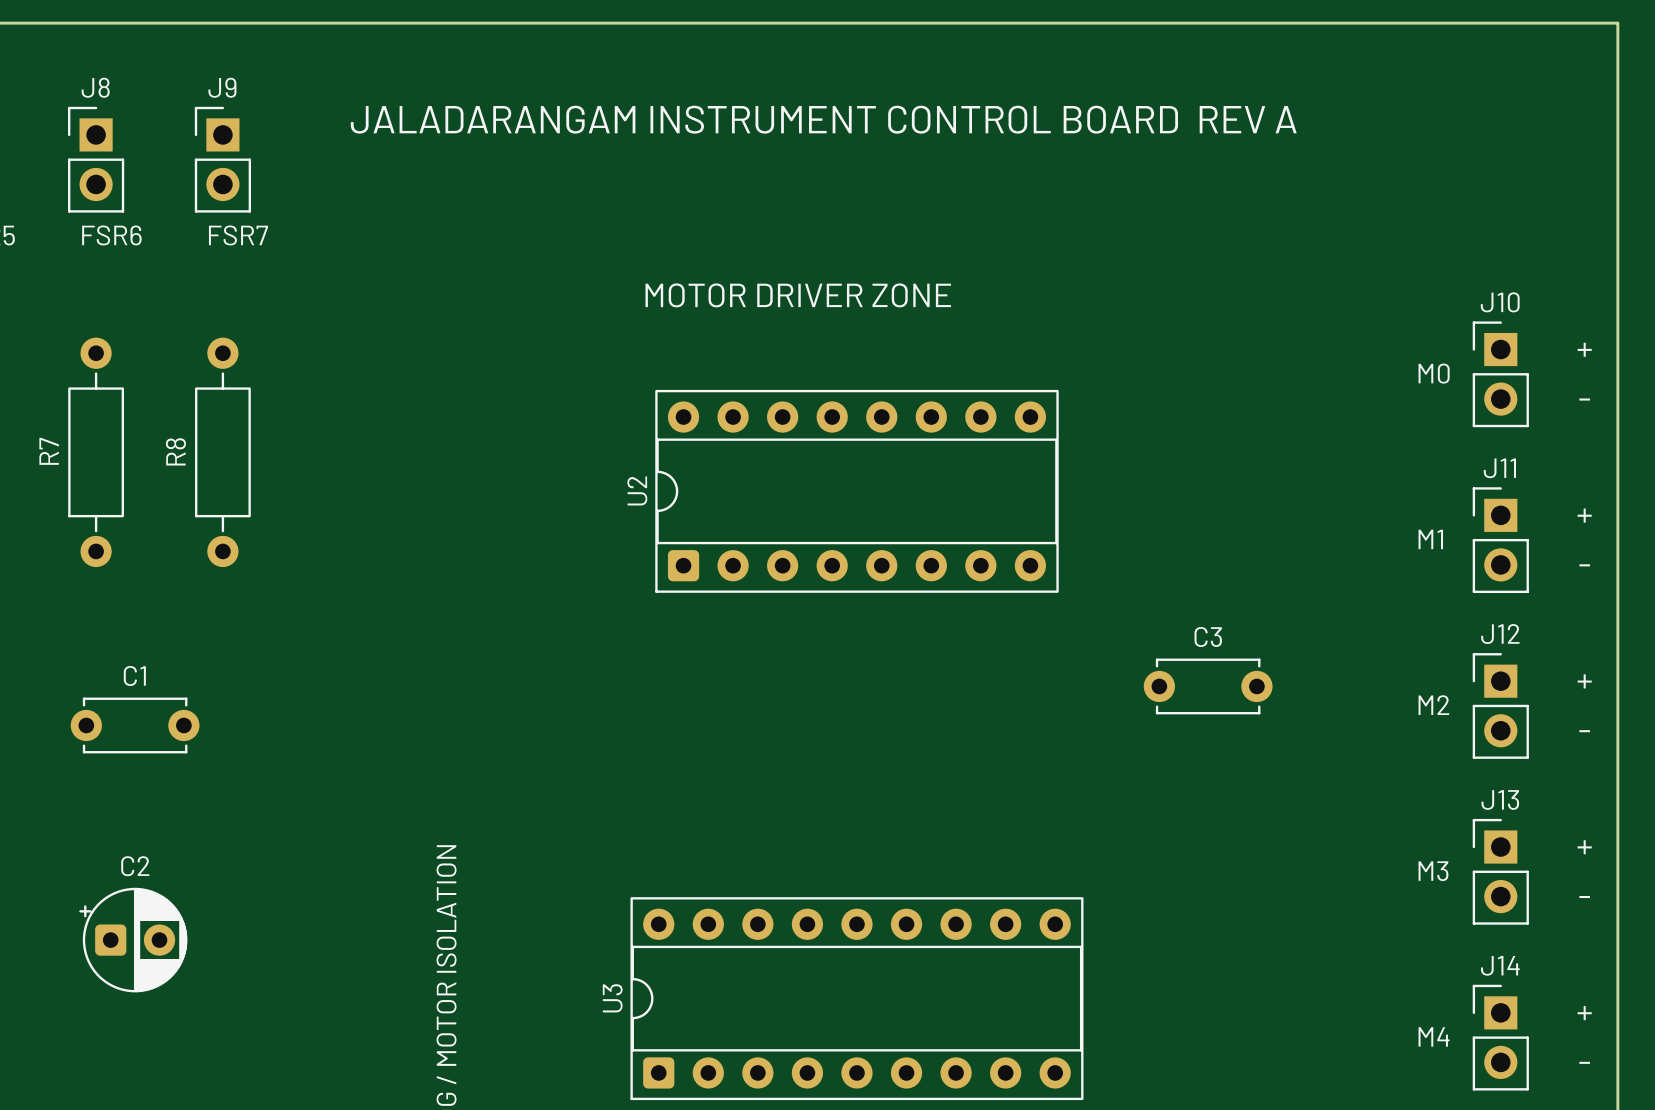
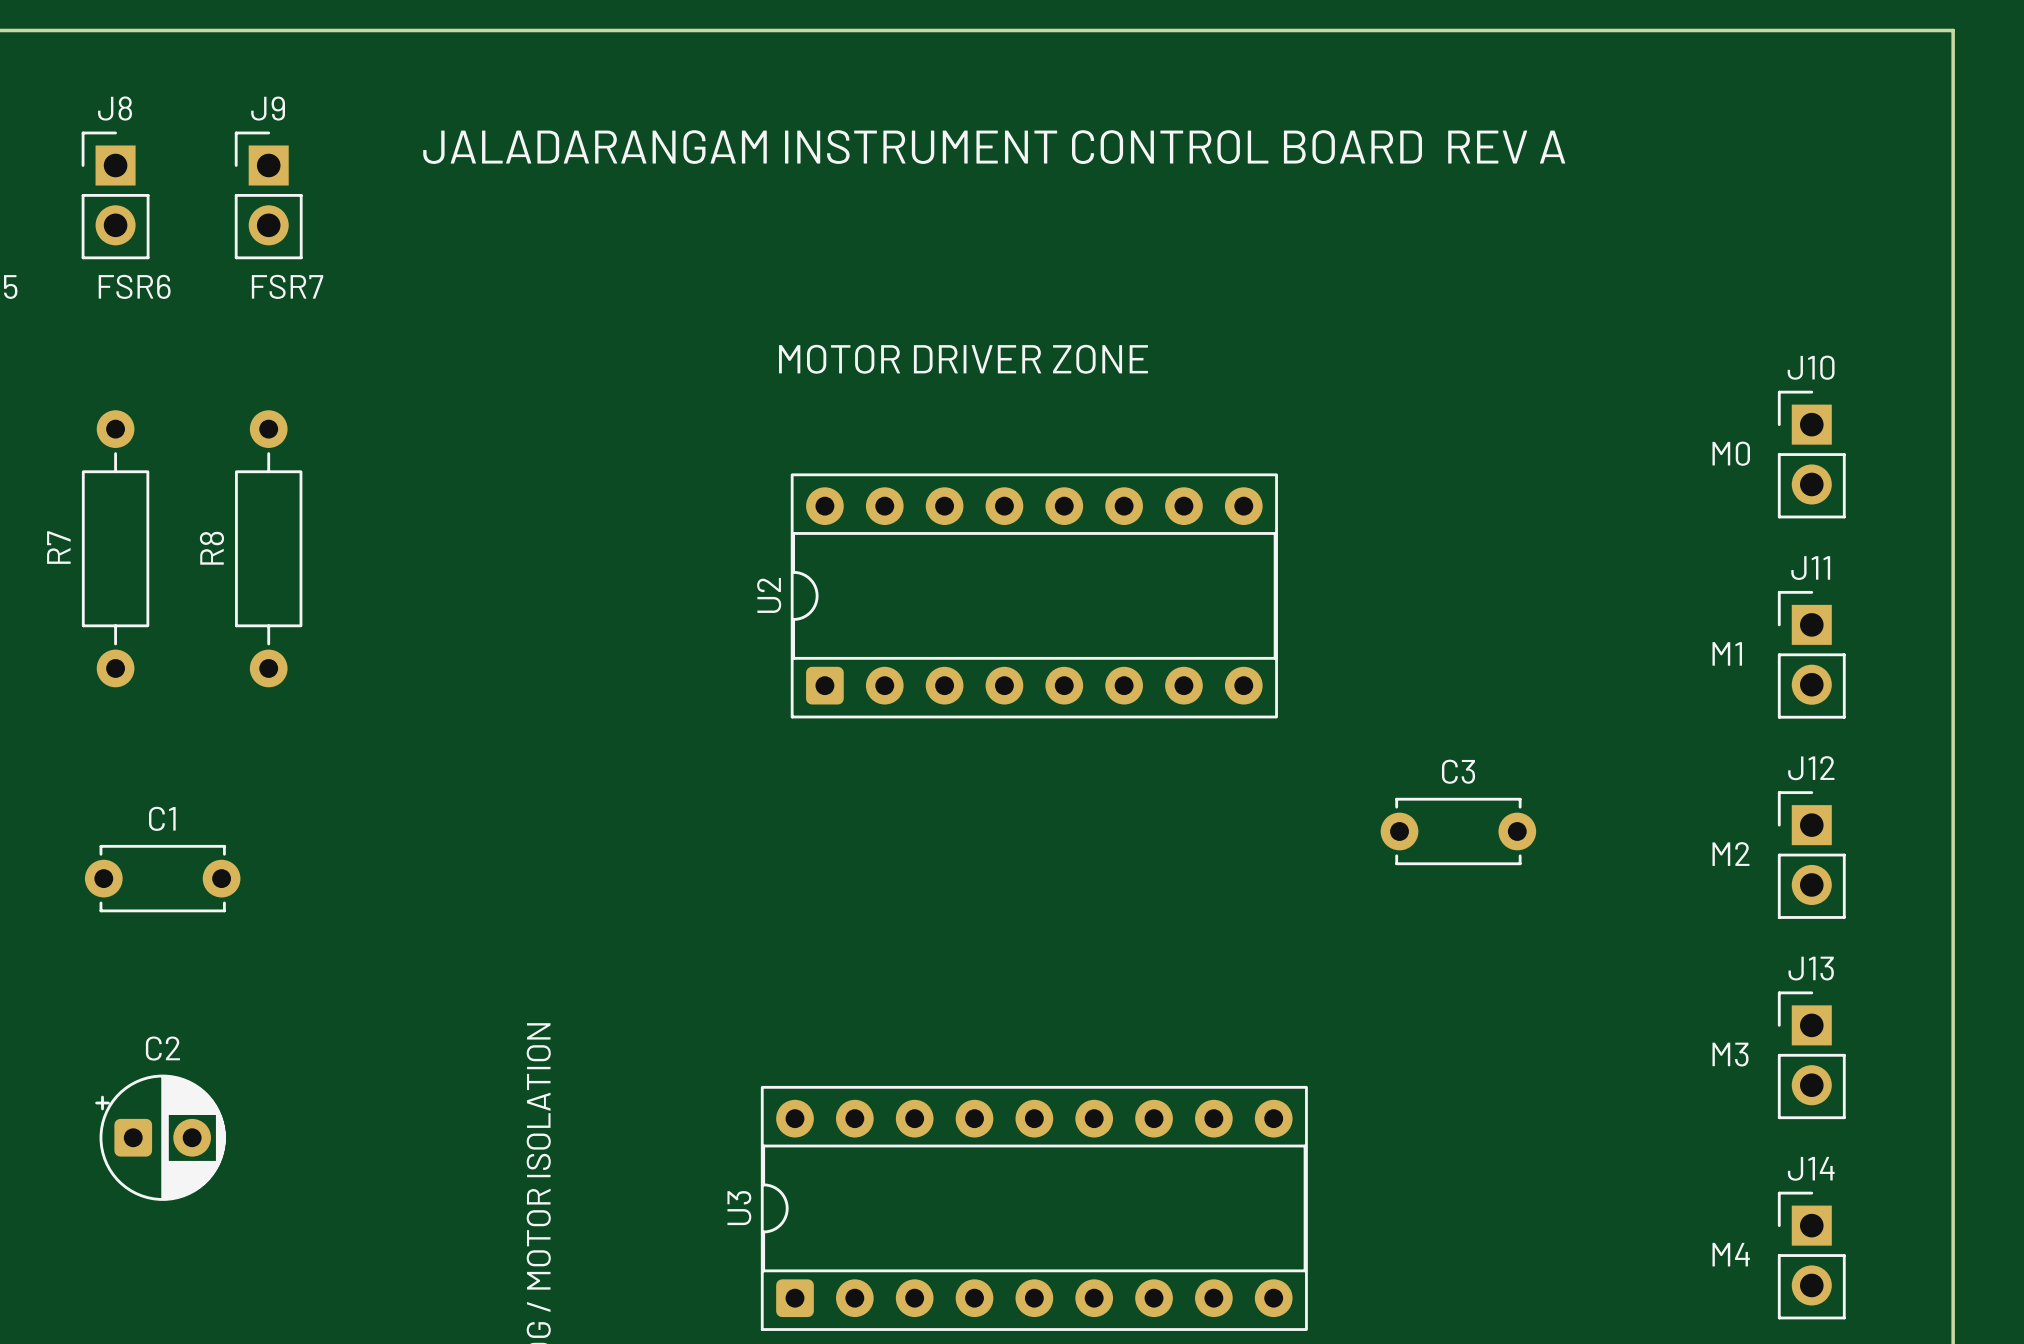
text: + (1584, 349) -> none
text: - (1584, 399) -> none
text: + (1584, 515) -> none
text: - (1584, 565) -> none
text: + (1584, 681) -> none
text: - (1584, 731) -> none
text: + (1584, 847) -> none
text: - (1584, 897) -> none
text: + (1584, 1013) -> none
text: - (1584, 1062) -> none

